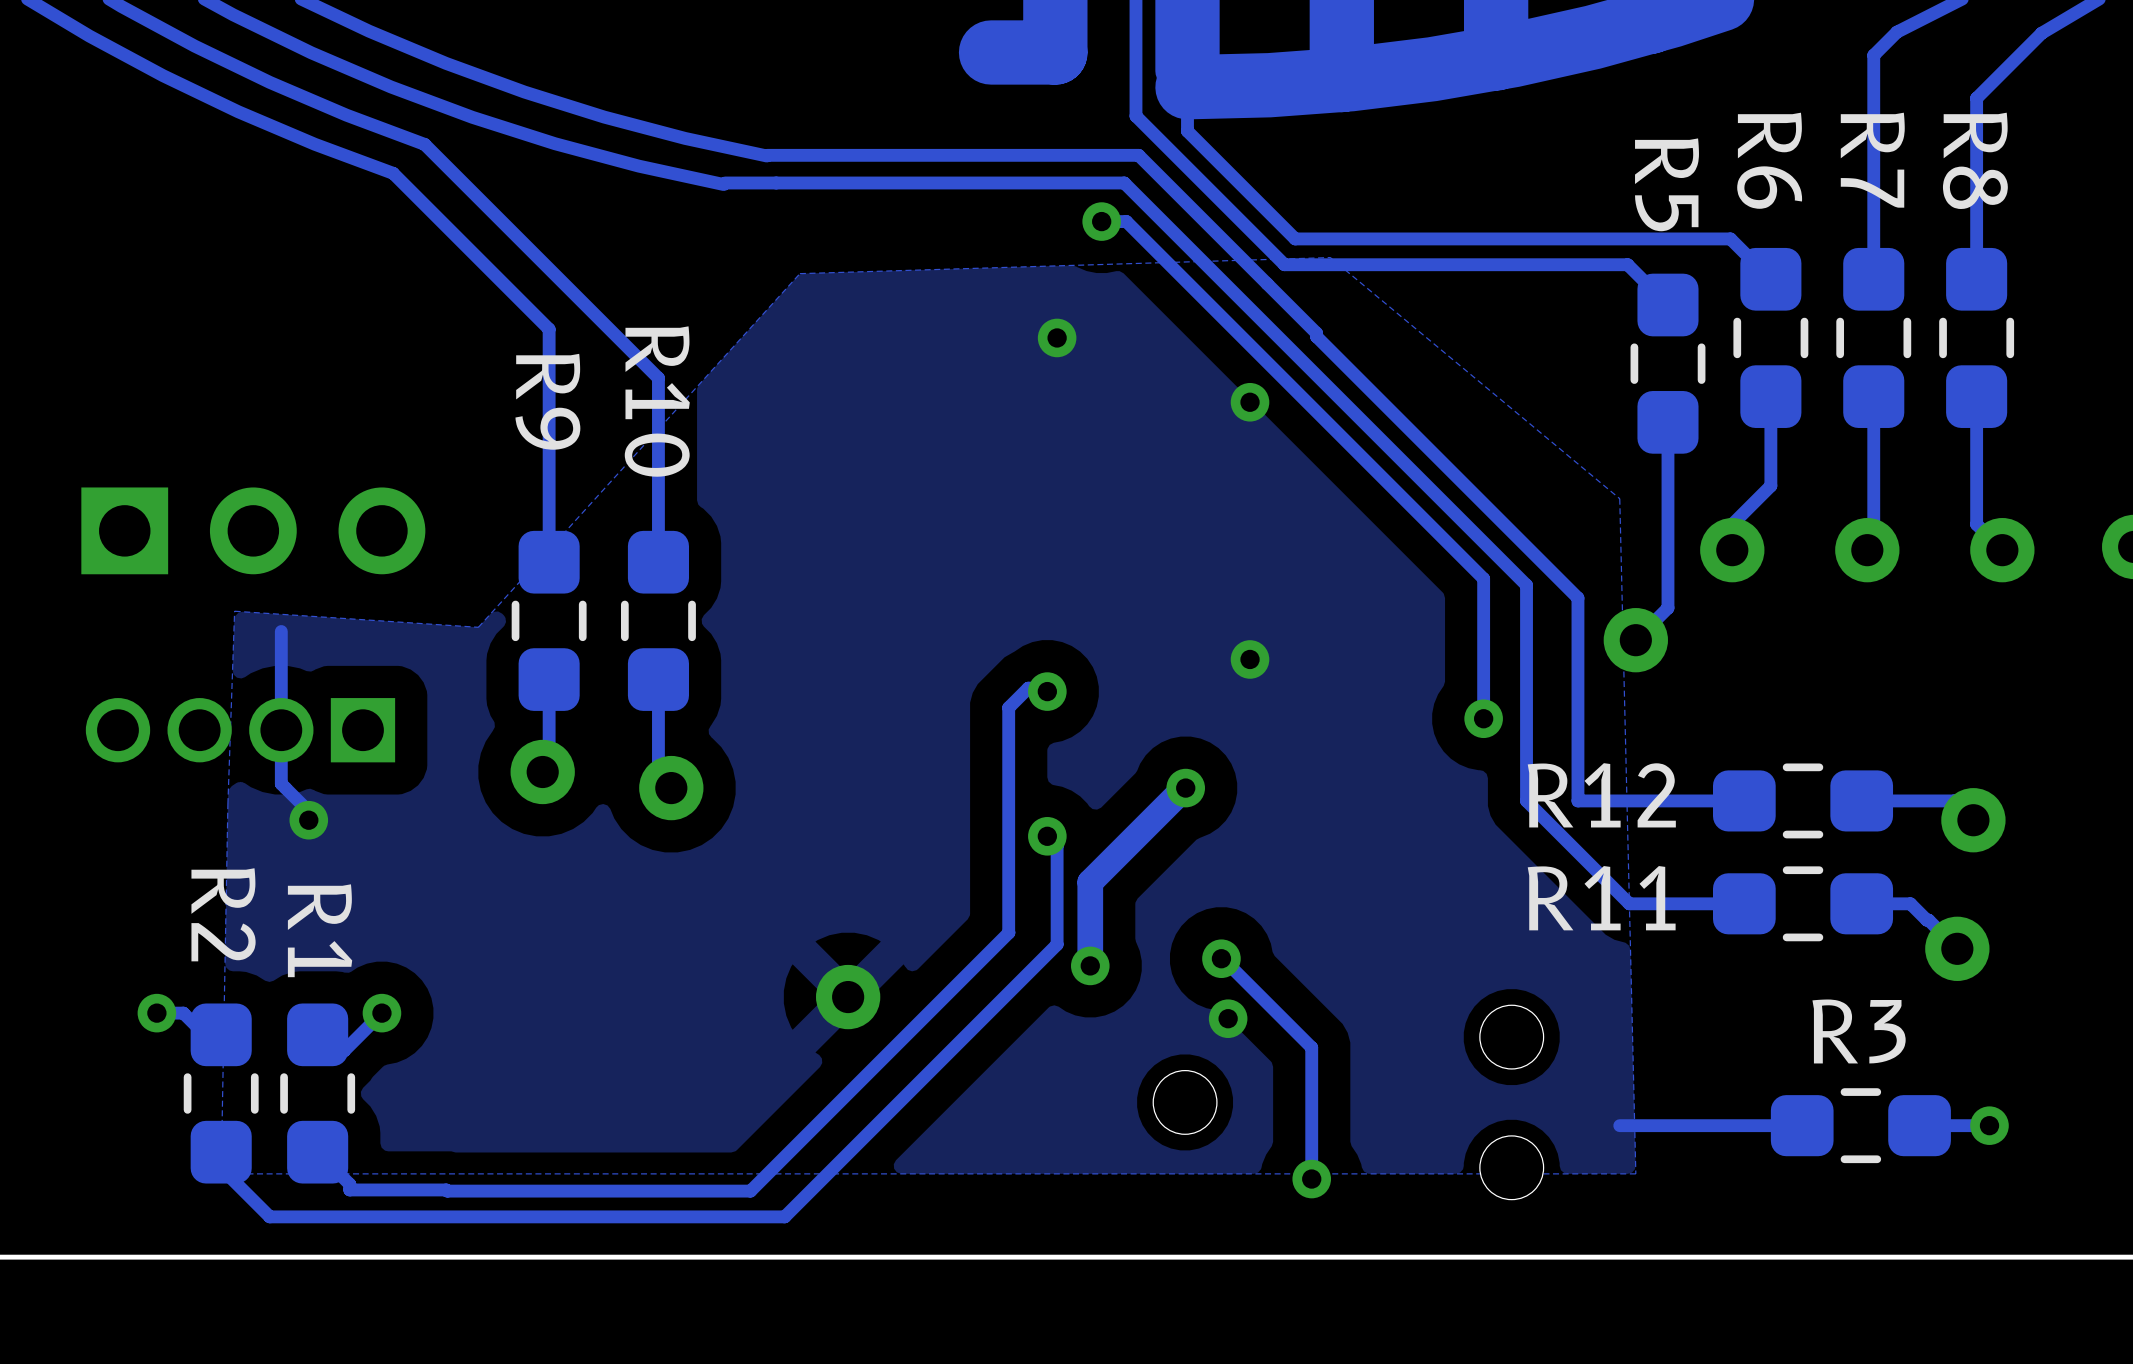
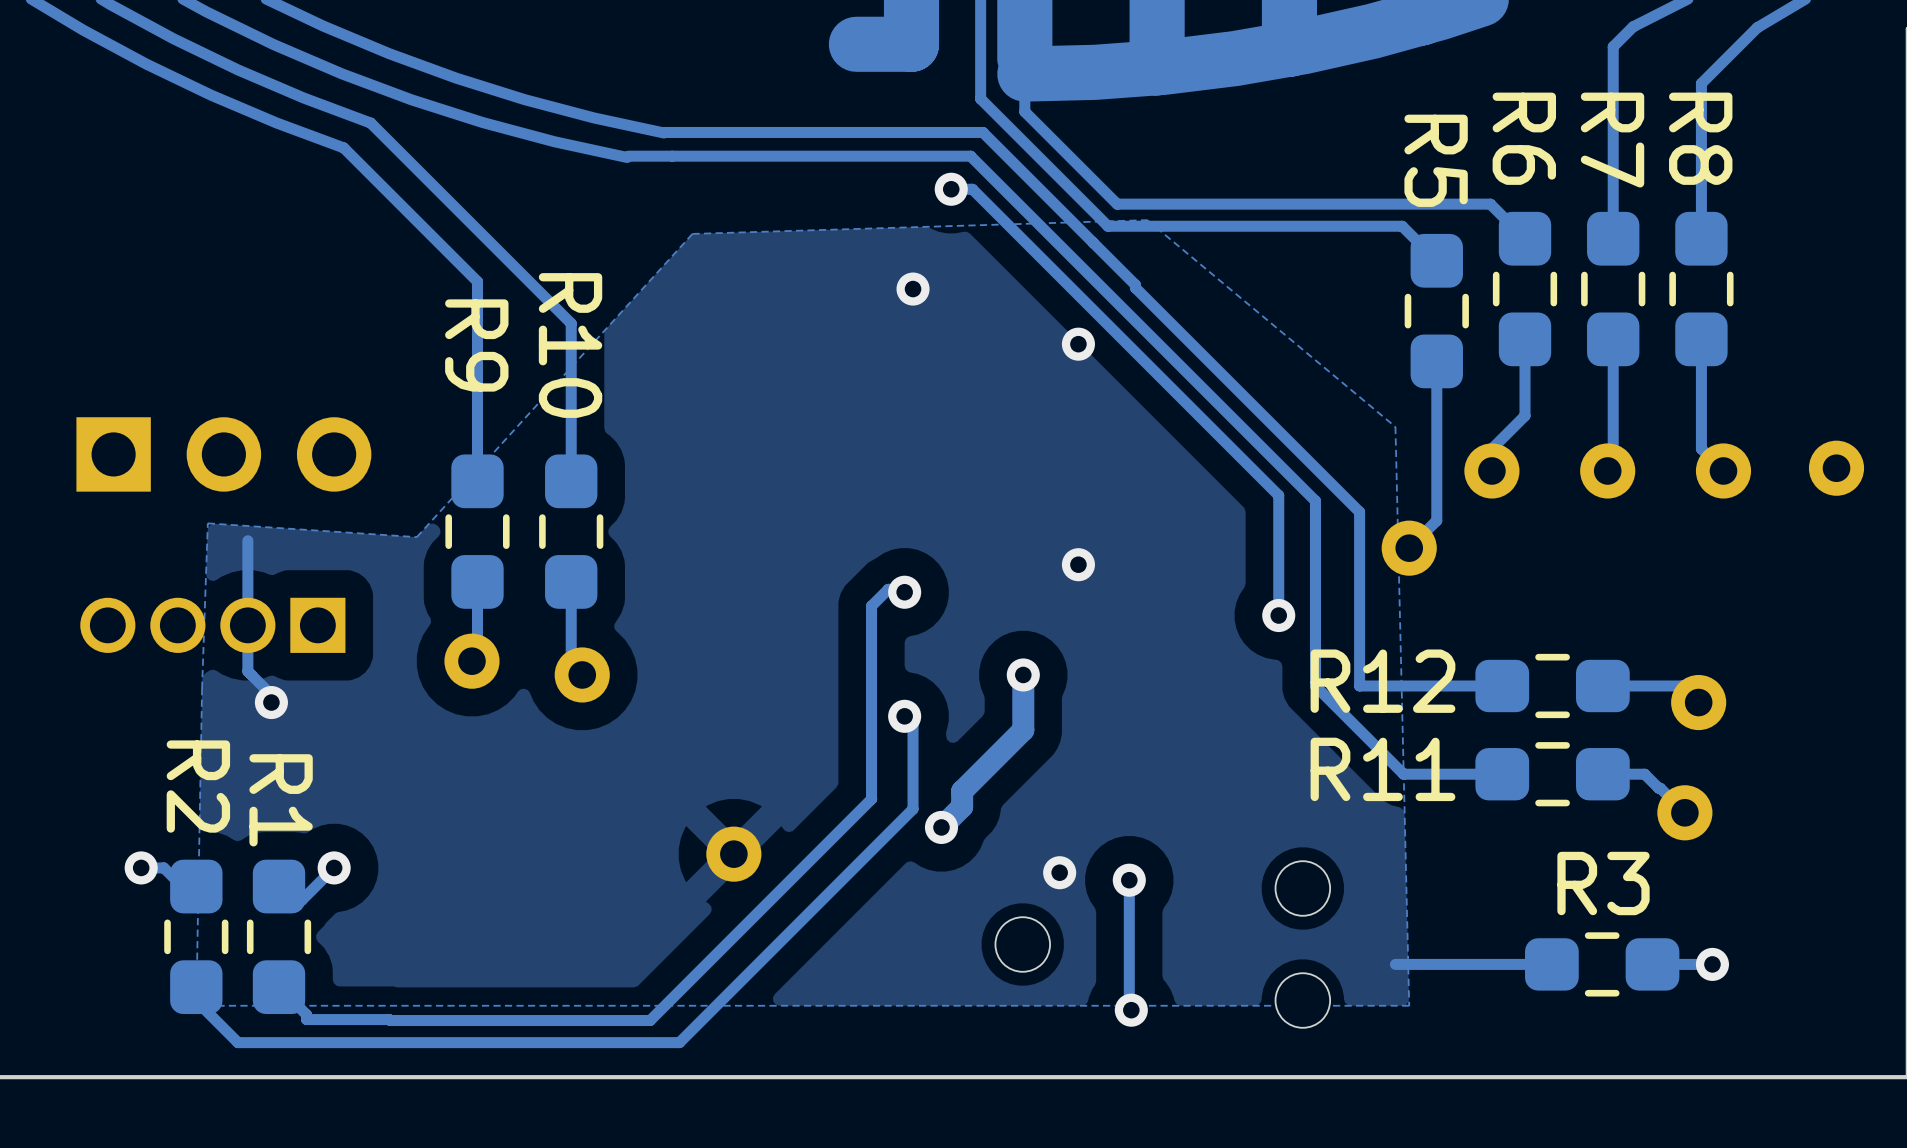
track: (1185, 788) (1090, 882) (1090, 965) -> (1023, 674) (1023, 730) (962, 791) (962, 806) (941, 827)
track: (1221, 958) (1311, 1047) (1311, 1179) -> none
via position: (1221, 958) -> (1129, 880)
track: none -> (1129, 880) (1129, 1008)

